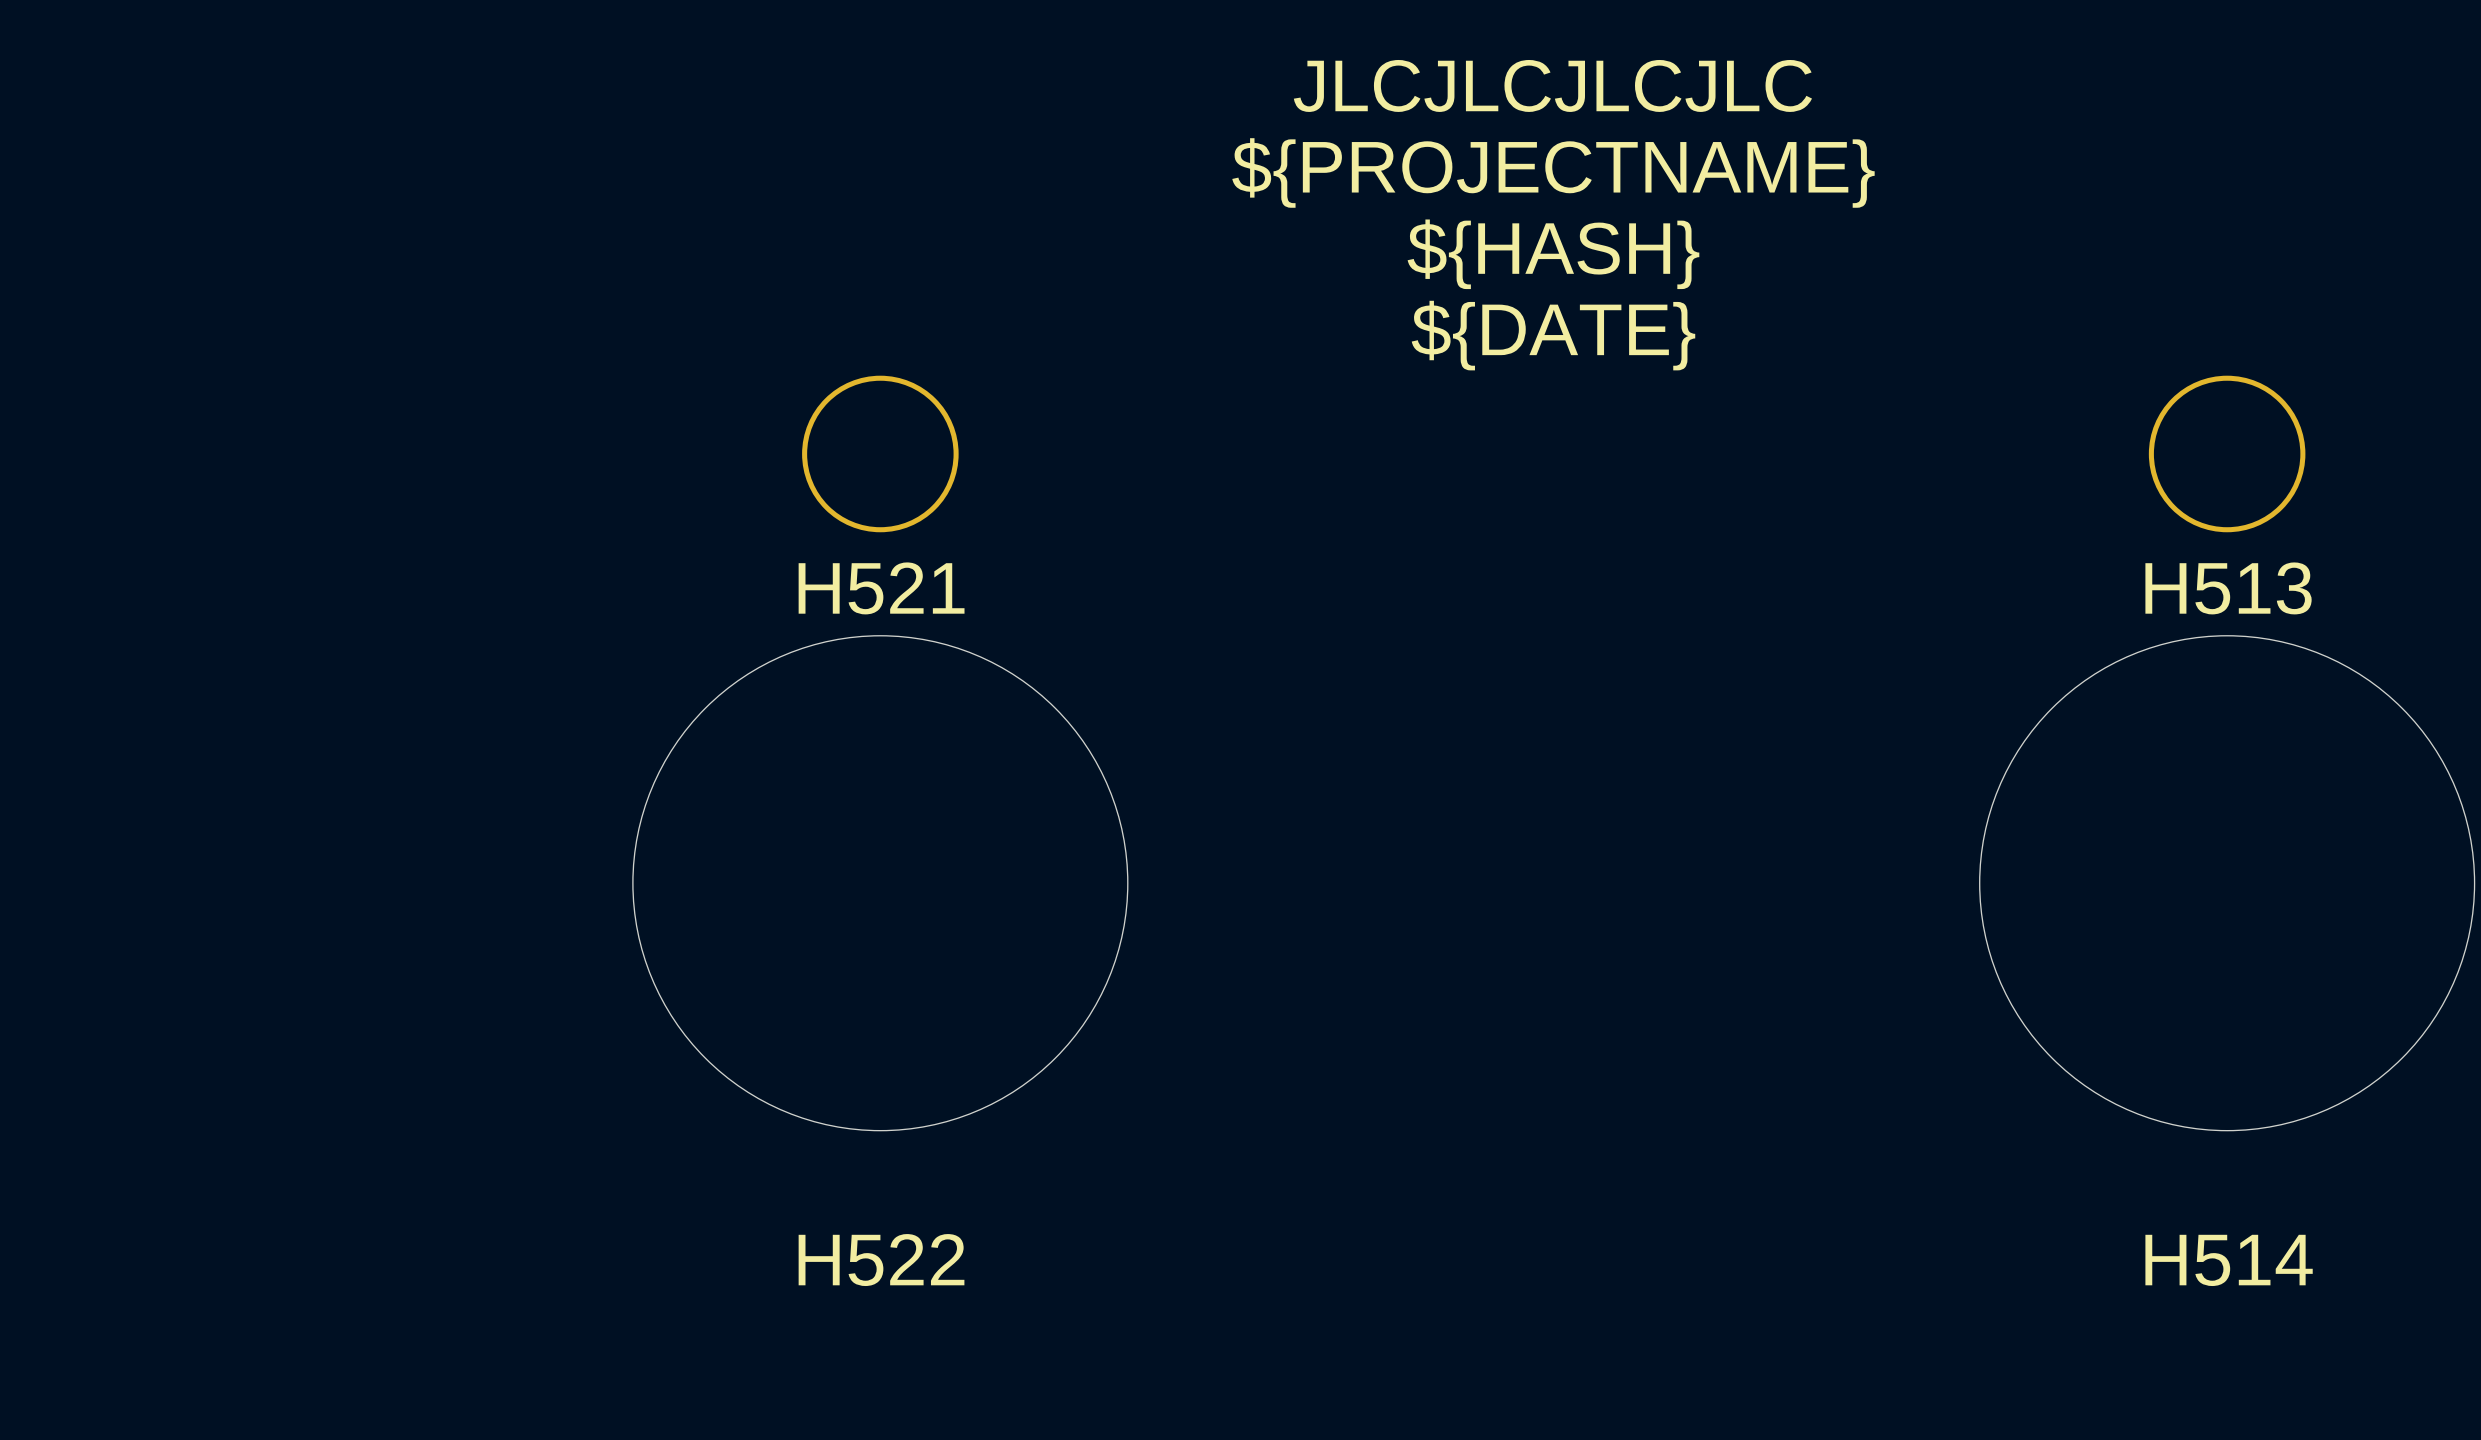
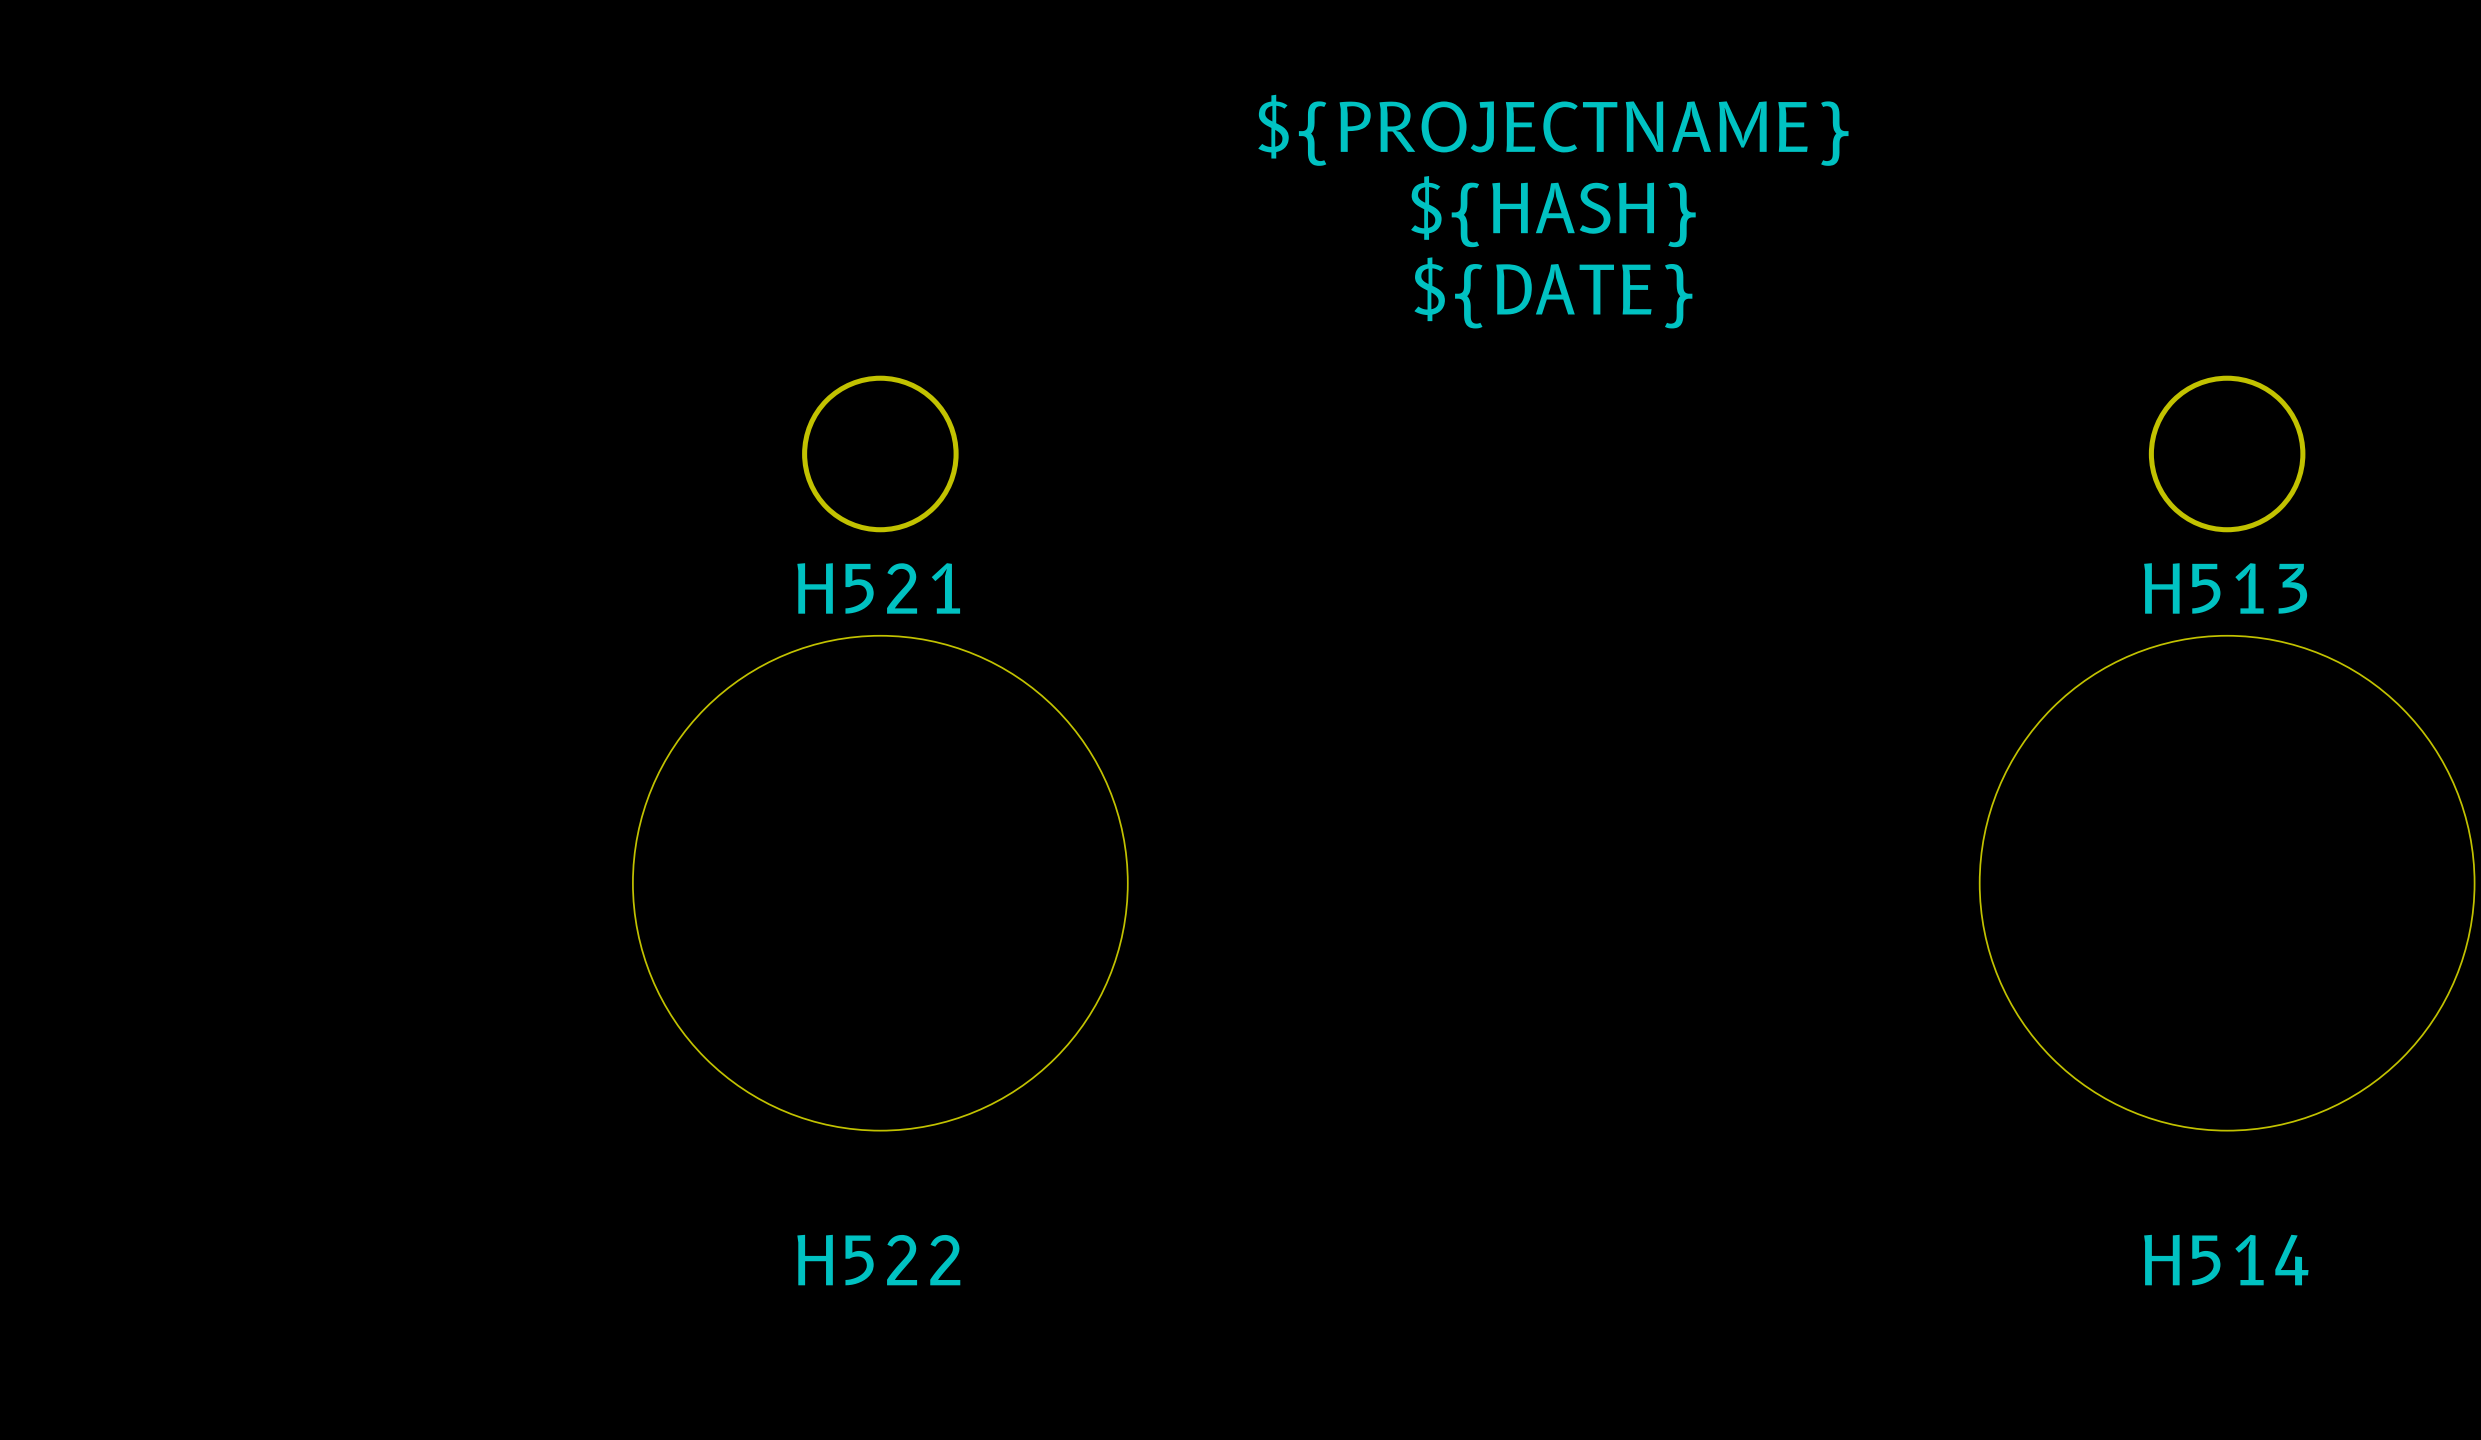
text: JLCJLCJLCJLC (1552, 85) -> none
text position: ${PROJECTNAME} (1553, 172) -> ${PROJECTNAME} (1553, 130)
text position: ${HASH} (1553, 254) -> ${HASH} (1553, 211)
text position: ${DATE} (1553, 335) -> ${DATE} (1553, 292)

